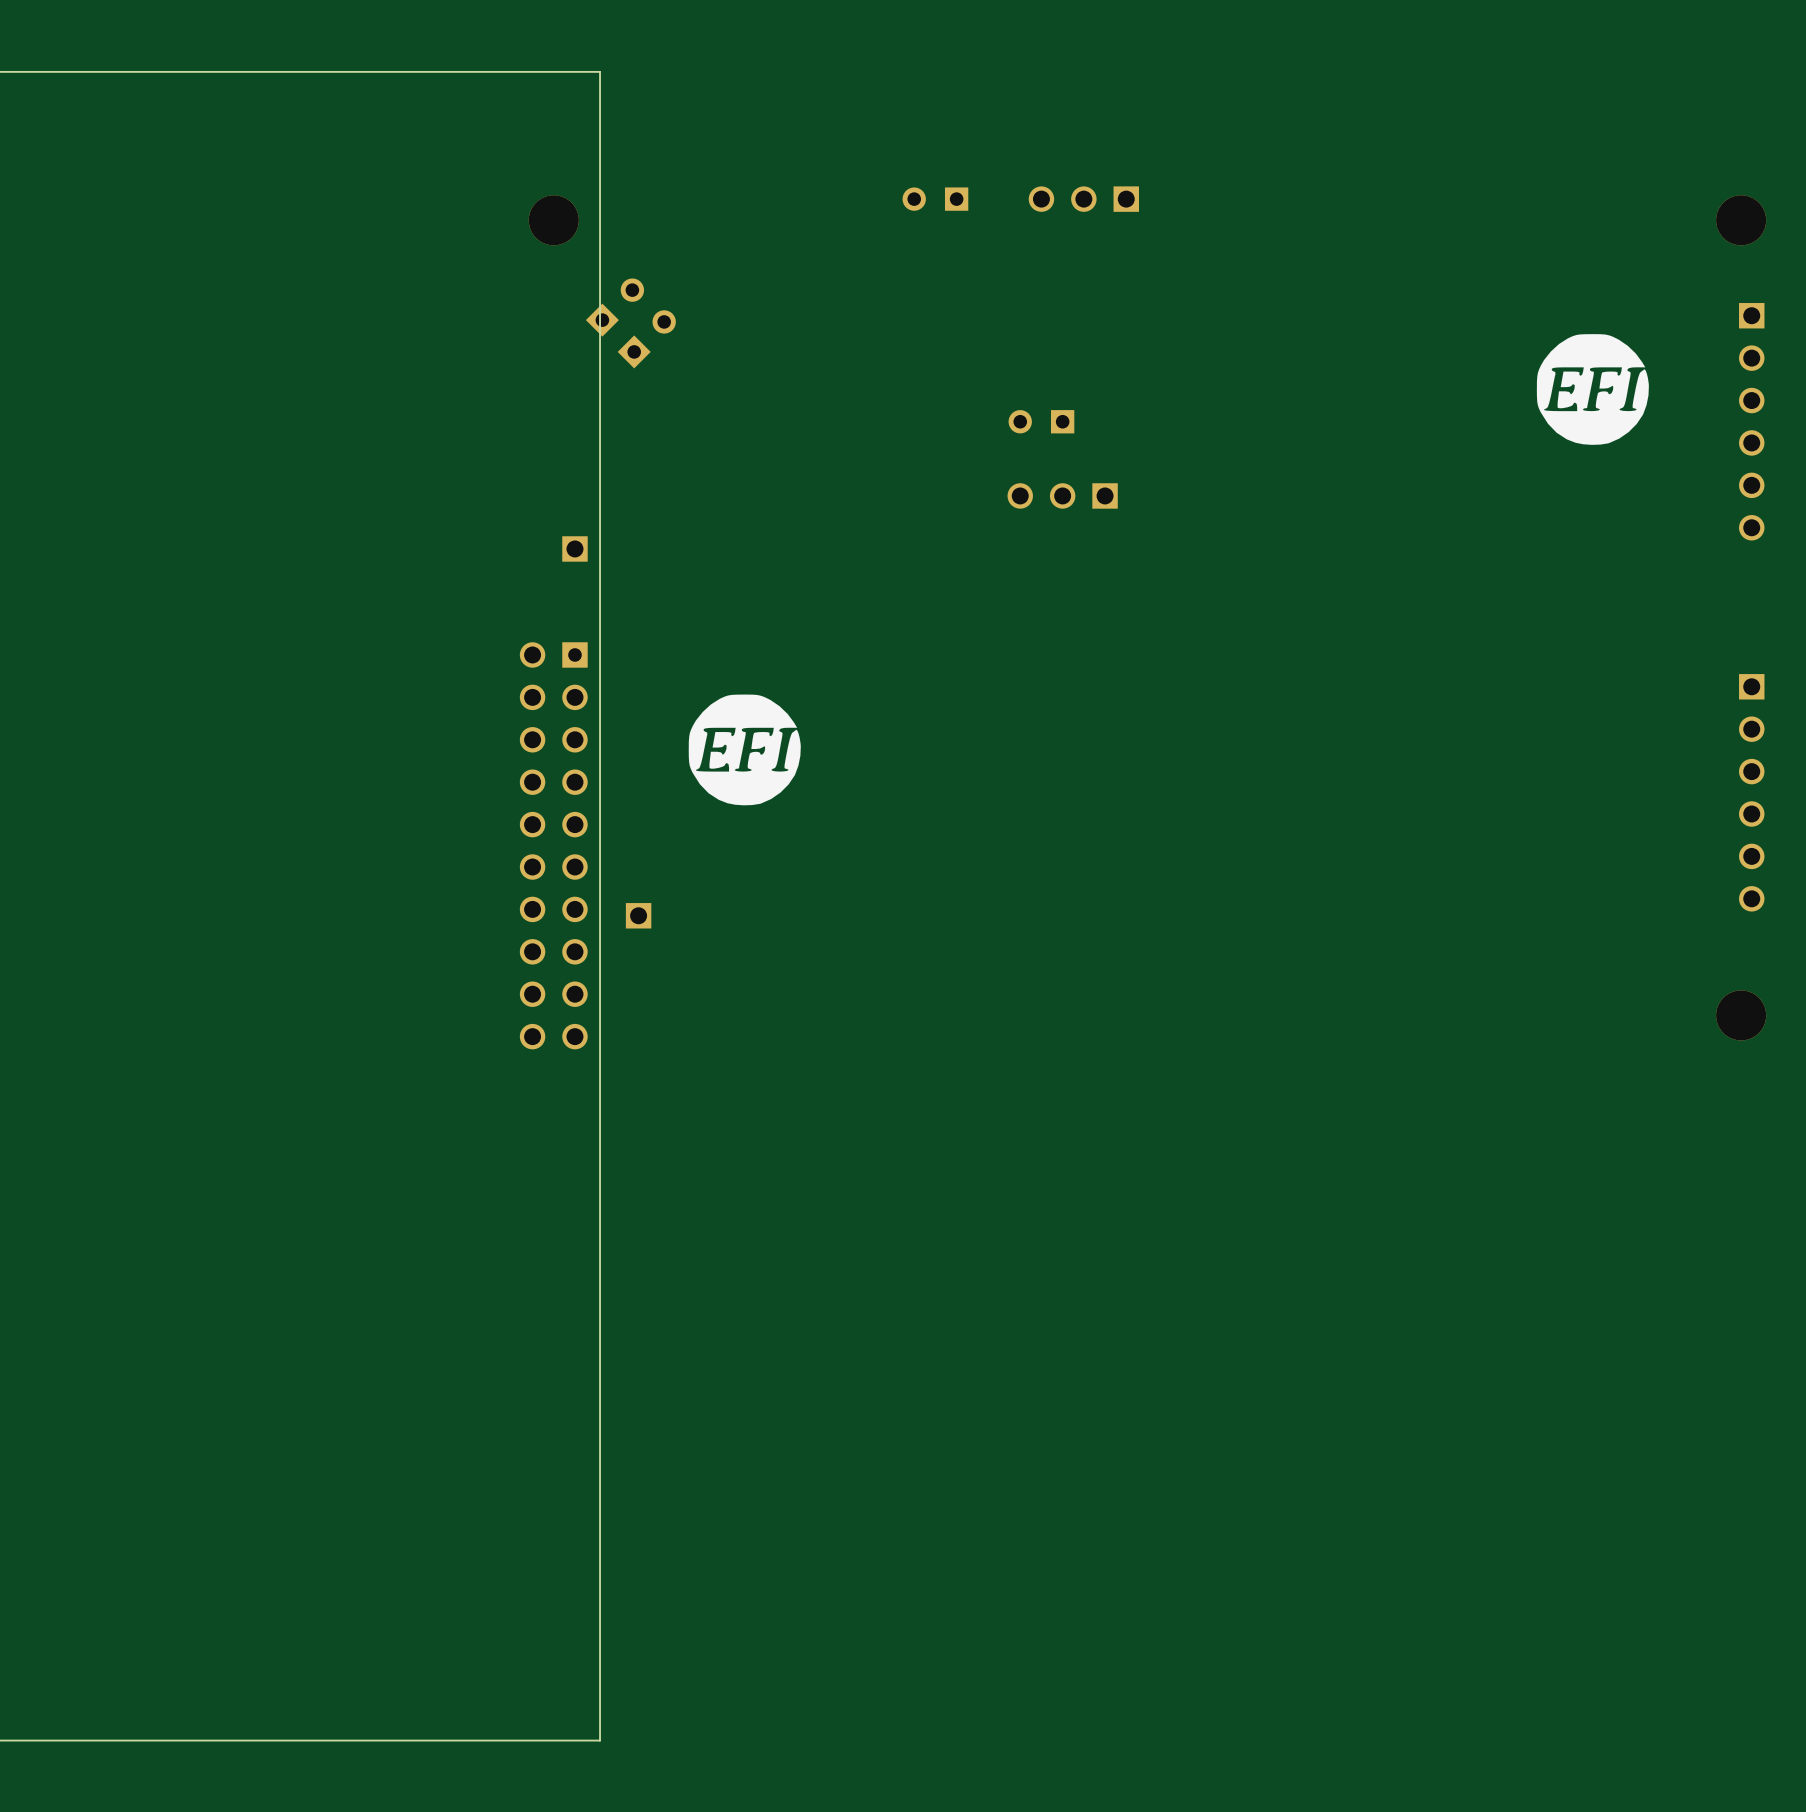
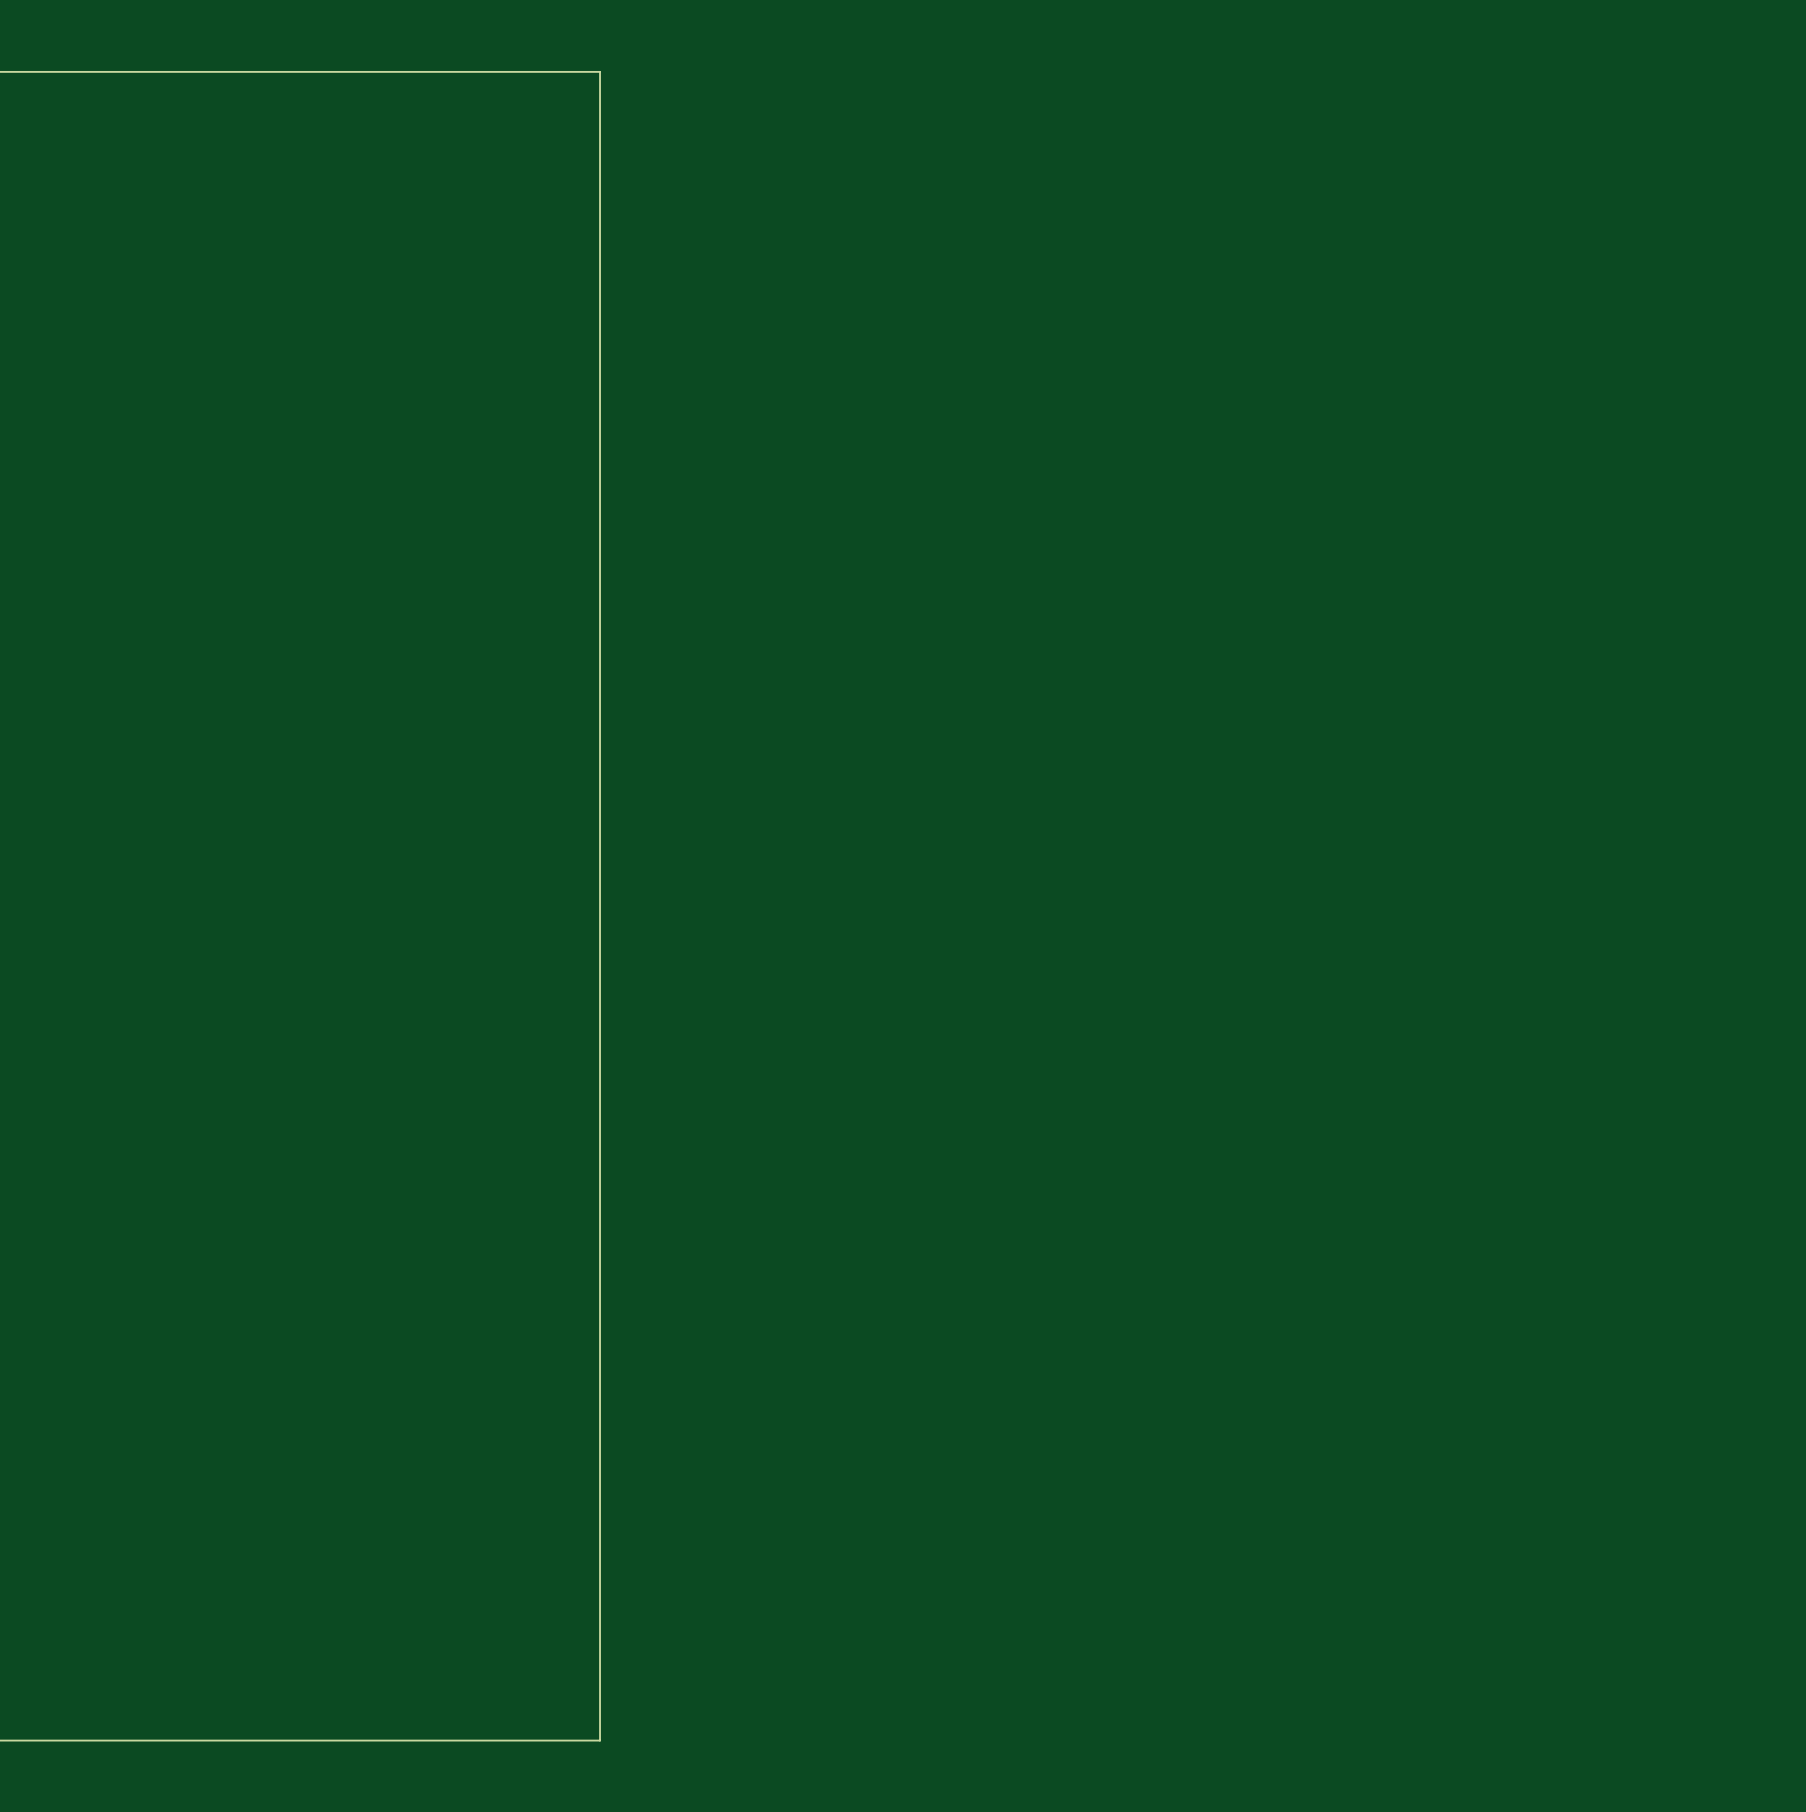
part: (935, 199) -> none
part: (1083, 199) -> none
part: (553, 220) -> none
part: (1741, 220) -> none
part: (614, 307) -> none
drawing: [1536, 334, 1649, 445] -> none
part: (646, 339) -> none
part: (1041, 421) -> none
part: (1751, 421) -> none
part: (1062, 495) -> none
part: (574, 548) -> none
drawing: [688, 694, 801, 806] -> none
part: (1751, 792) -> none
part: (553, 845) -> none
part: (638, 915) -> none
part: (1741, 1015) -> none

